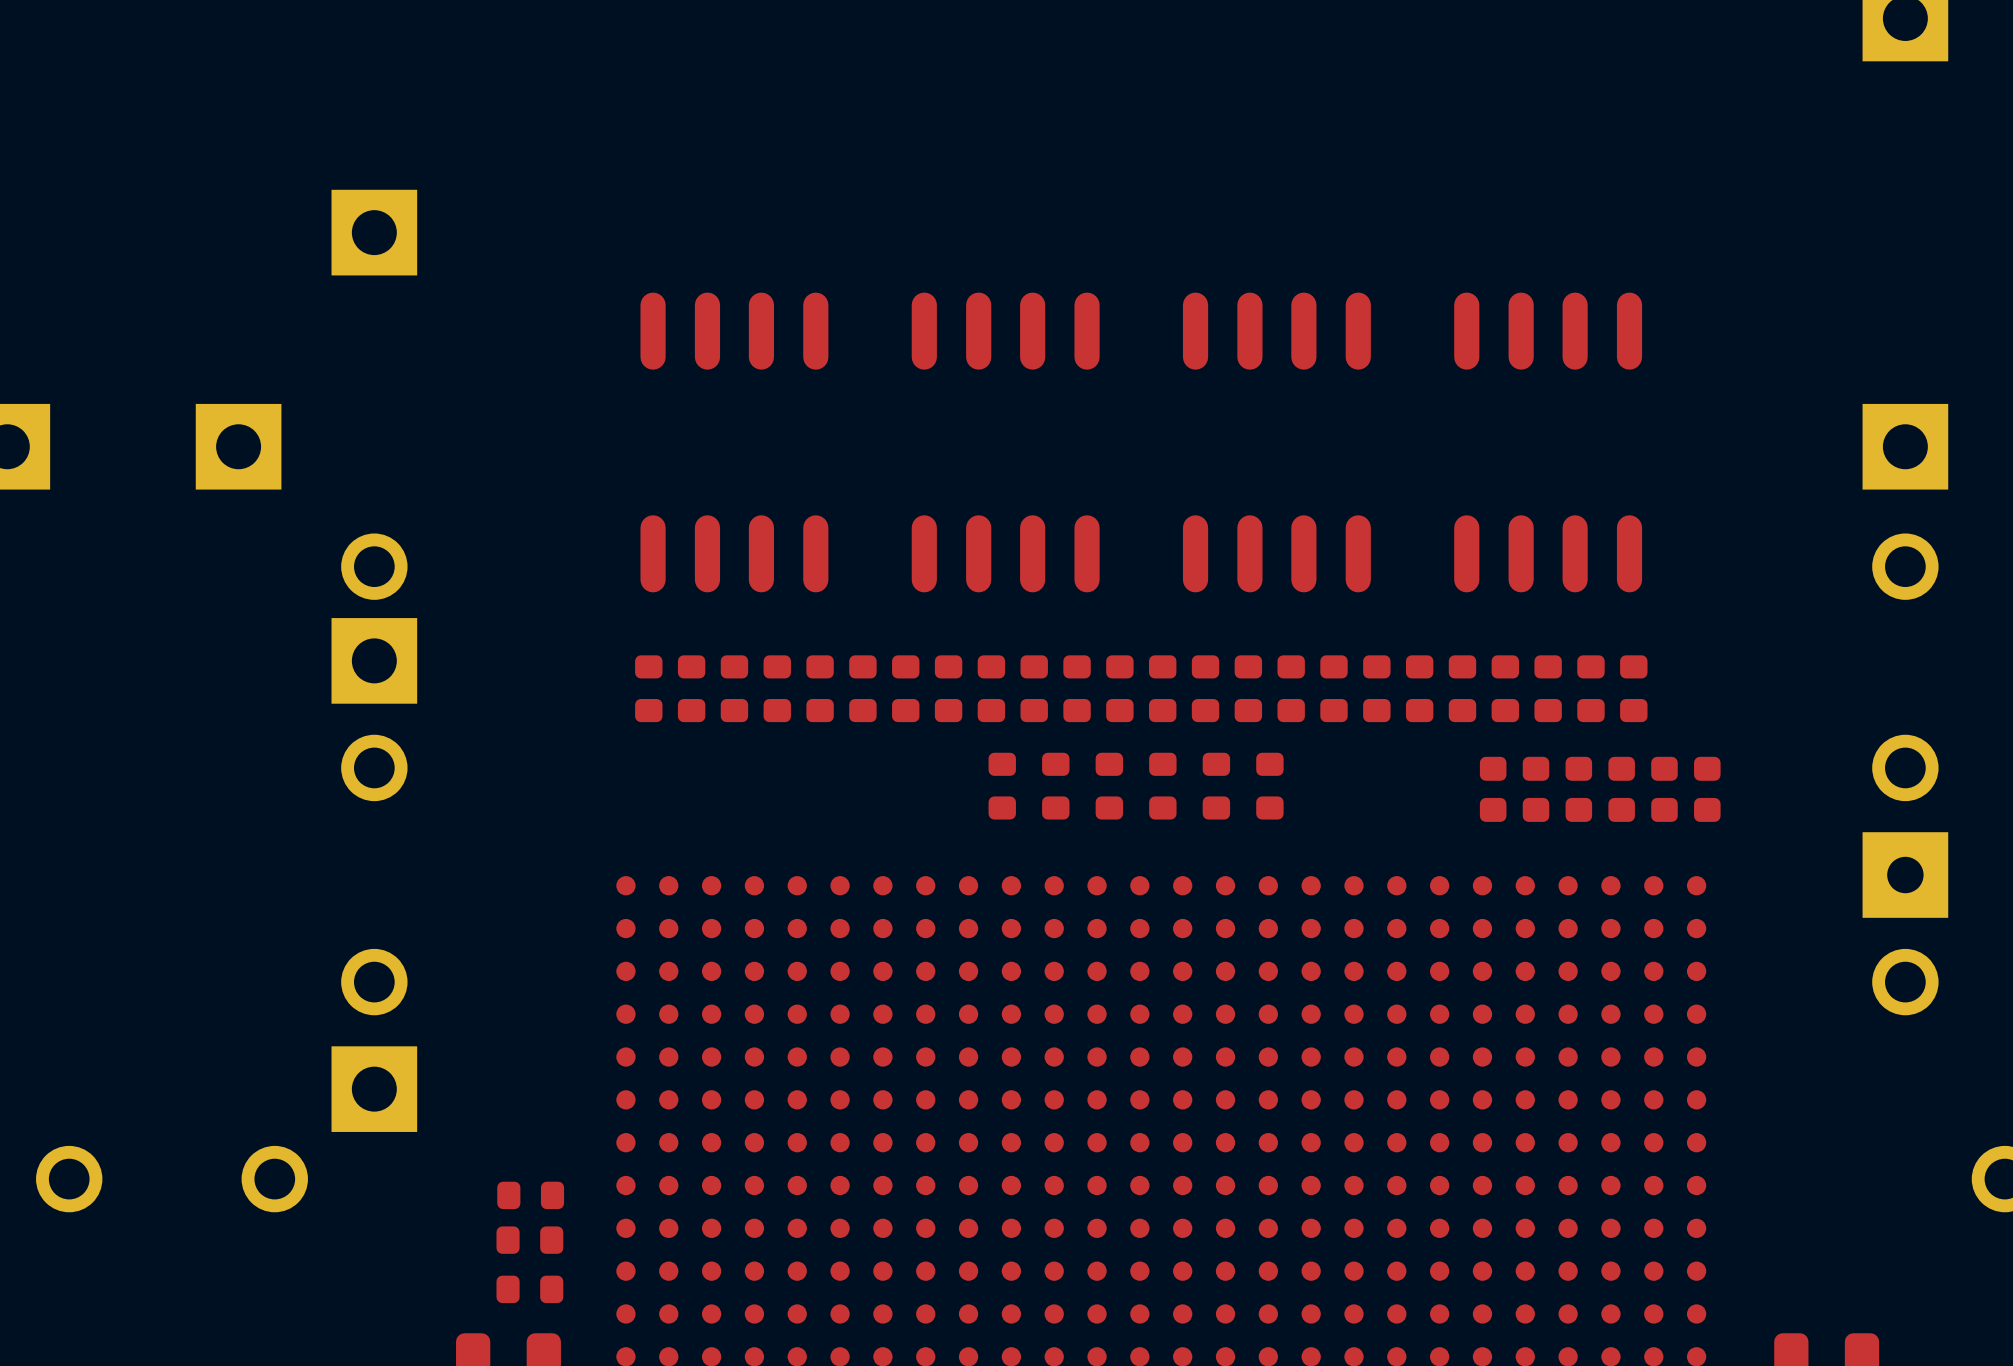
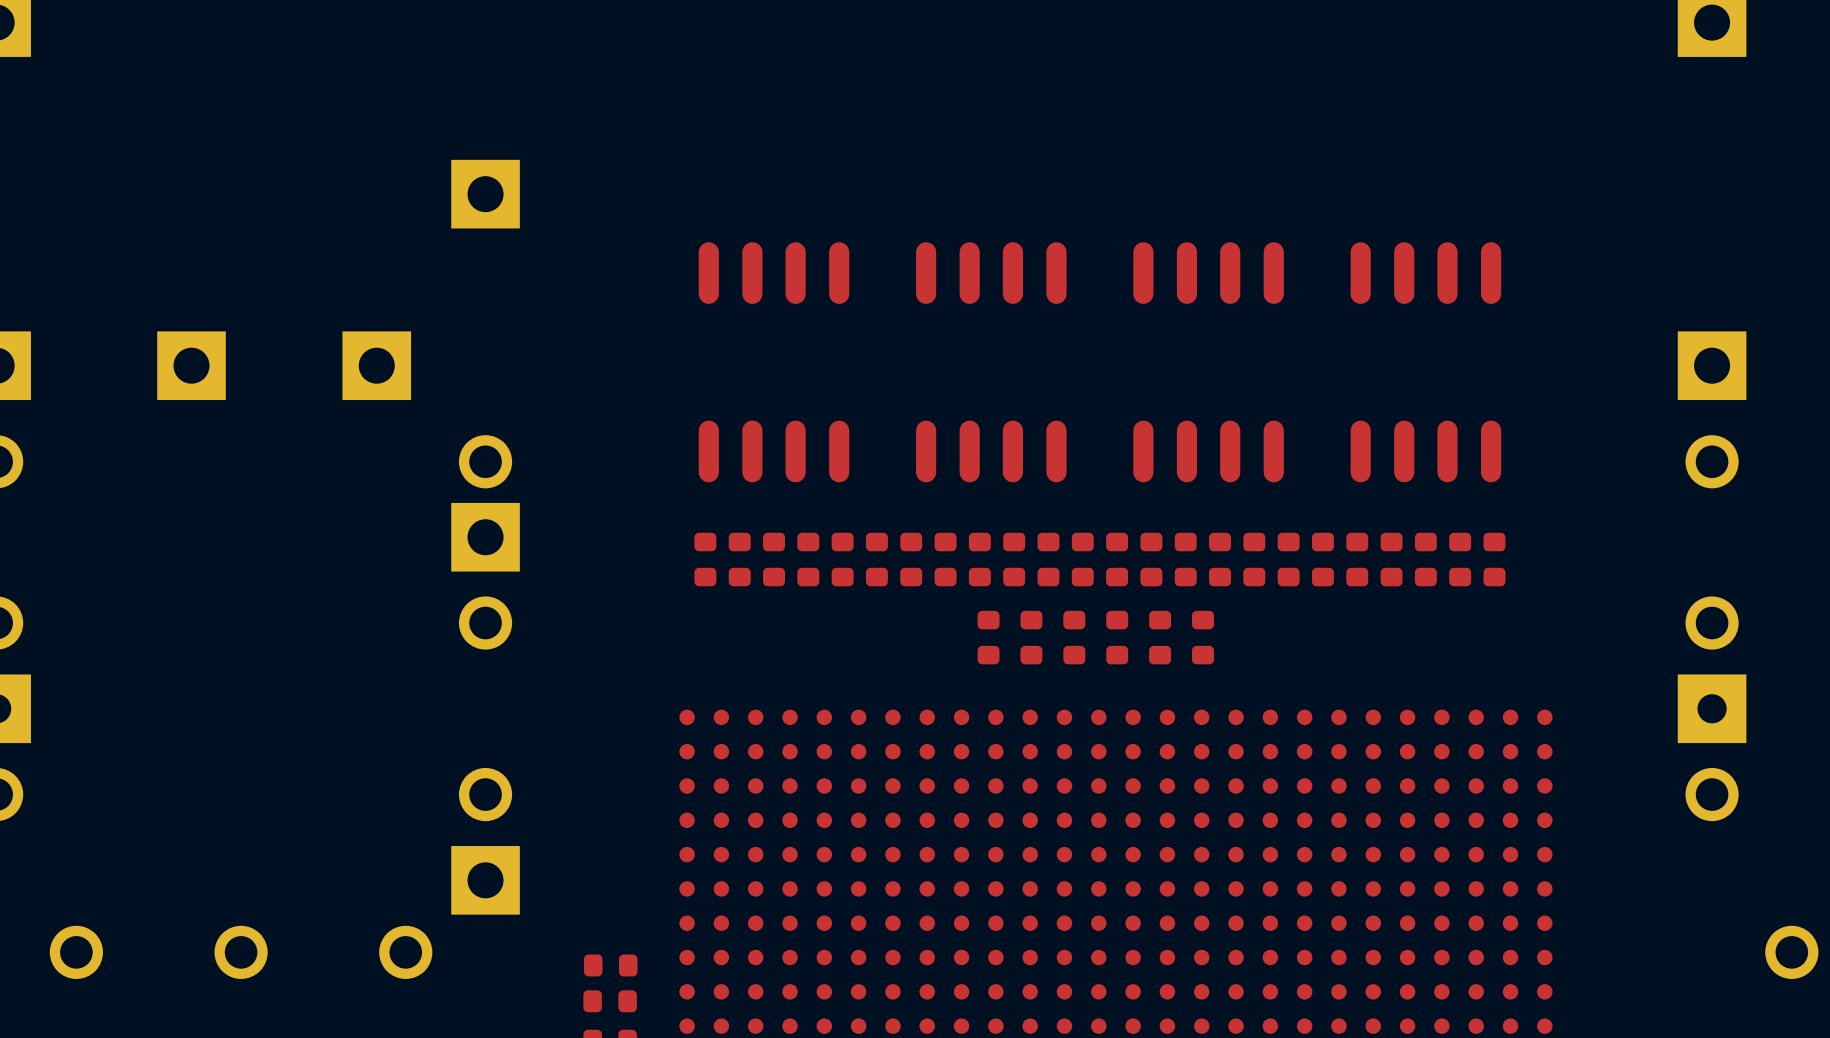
part: (1493, 789) -> none
part: (1536, 789) -> none
part: (1578, 789) -> none
part: (1621, 789) -> none
part: (1664, 789) -> none
part: (1707, 789) -> none

